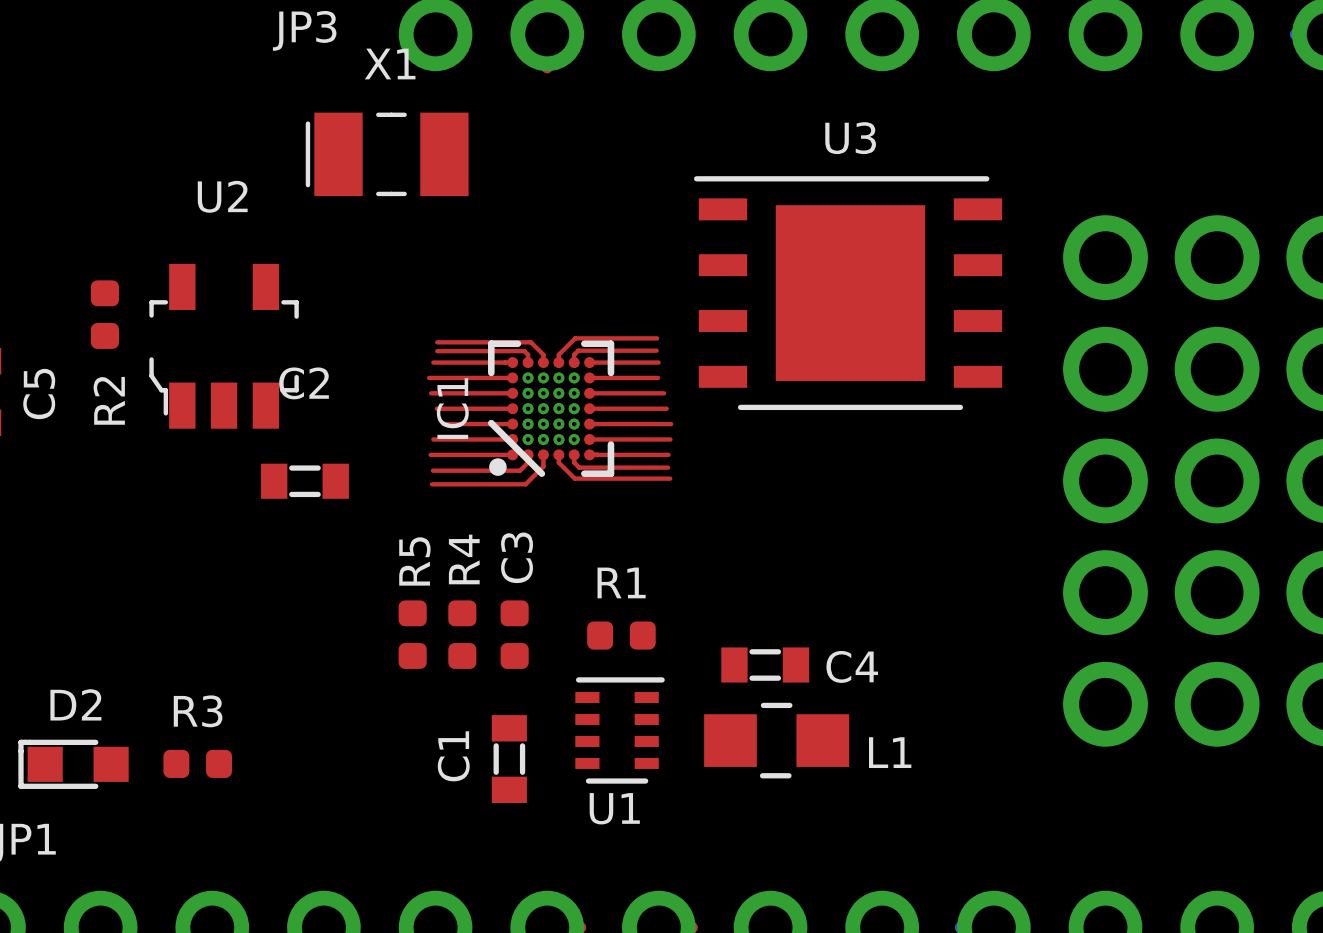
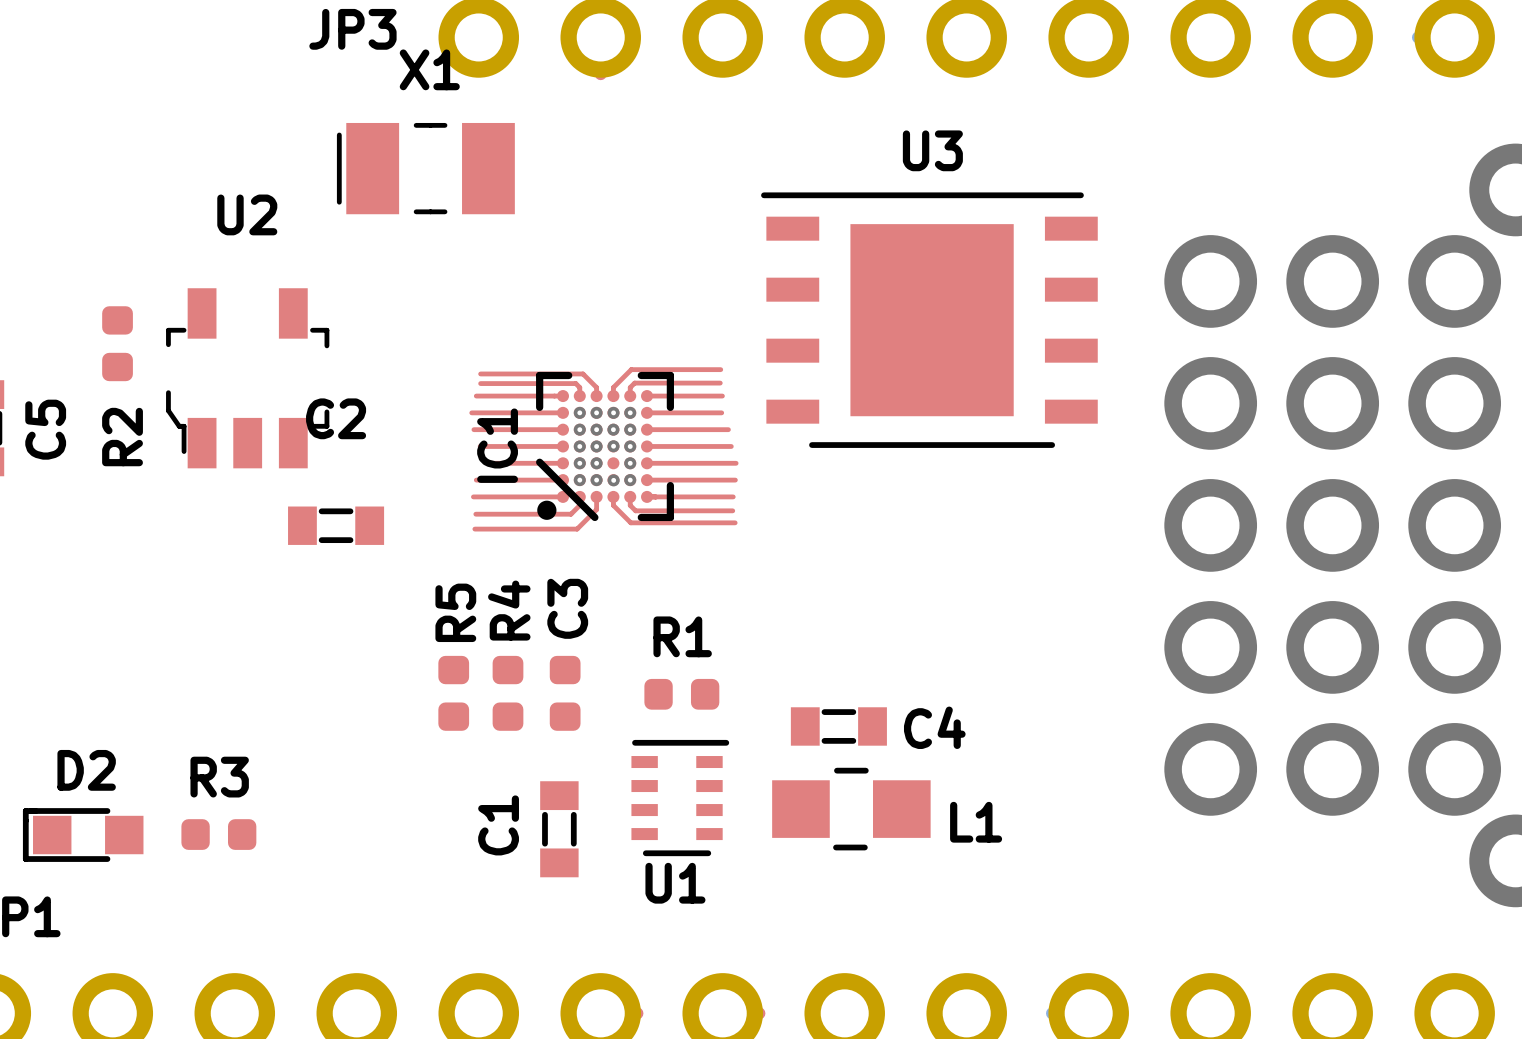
via: (558, 424) -> none

